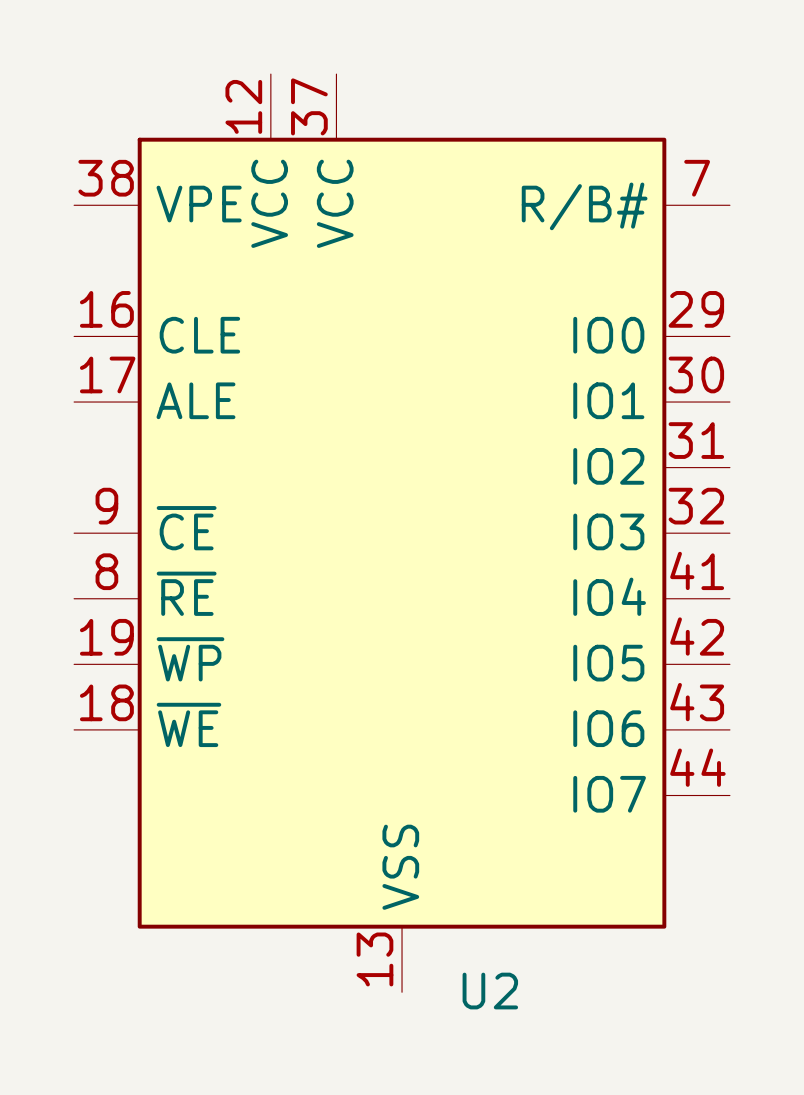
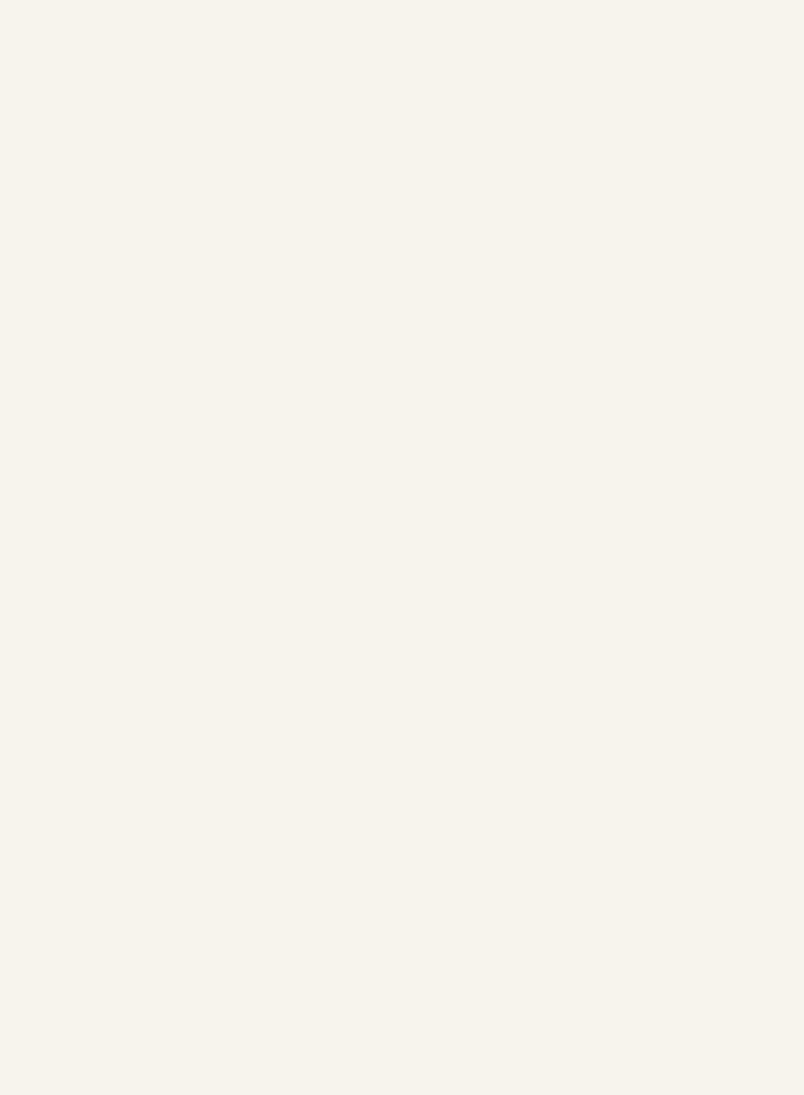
U2: (402, 533) -> none

